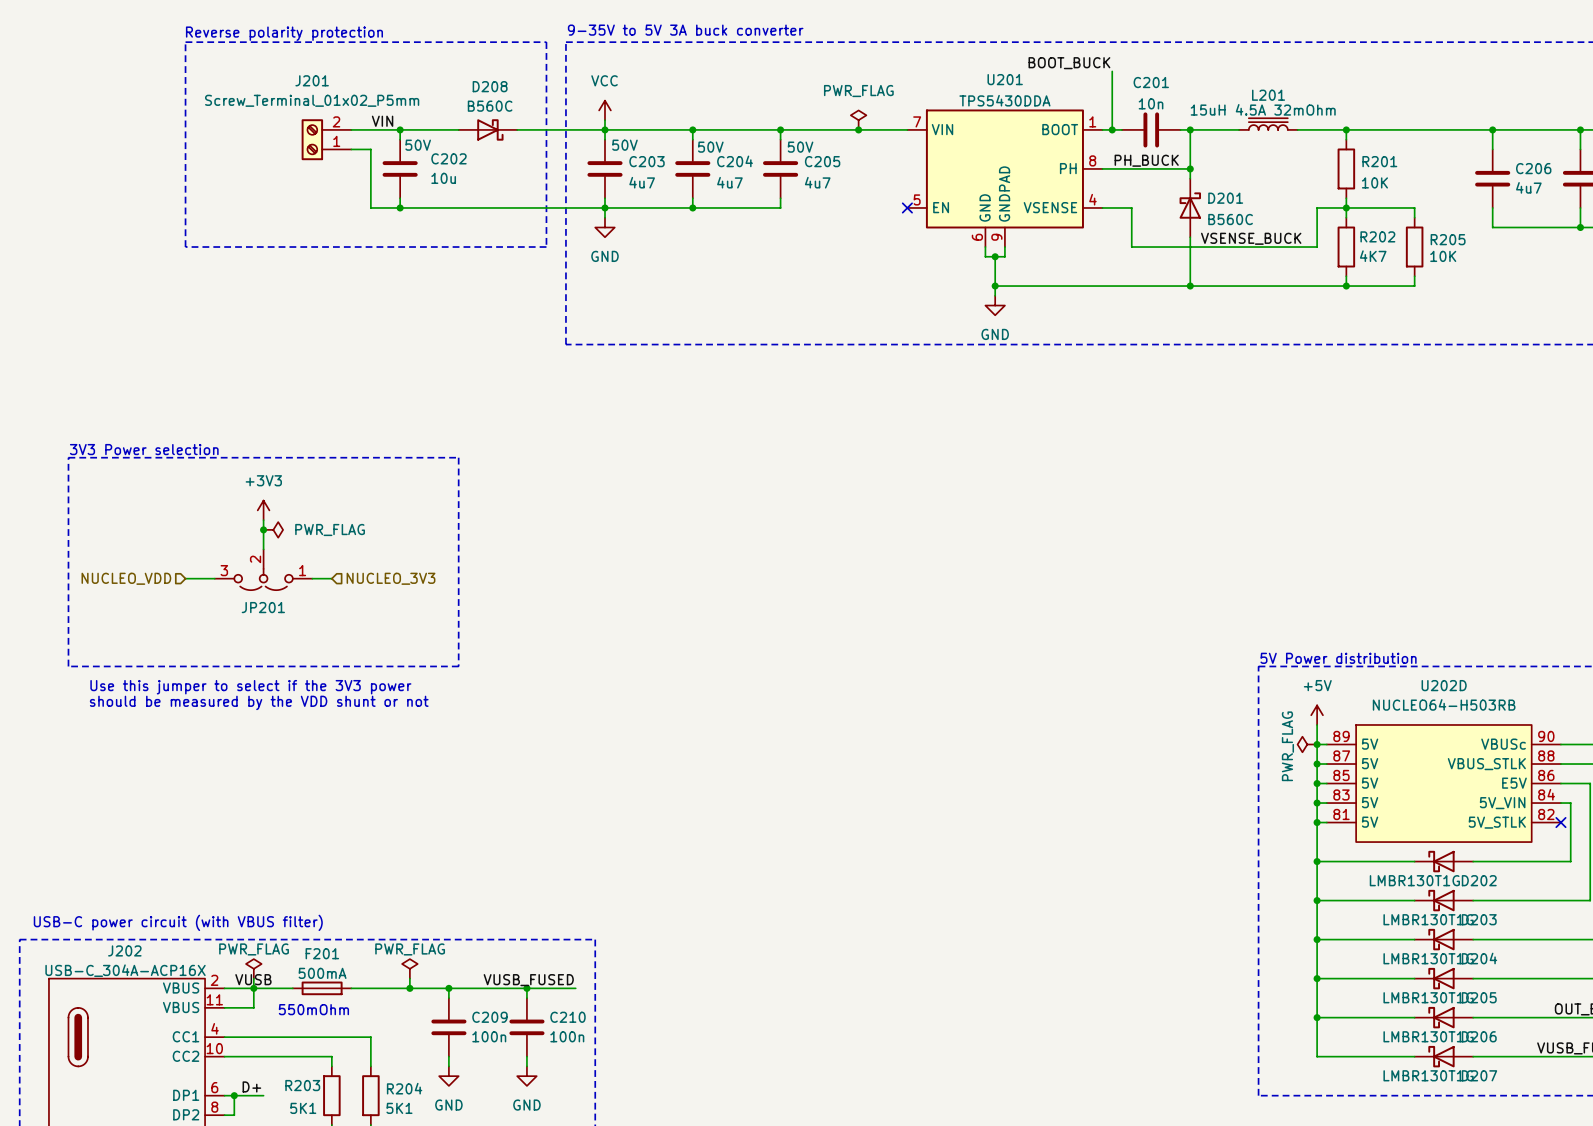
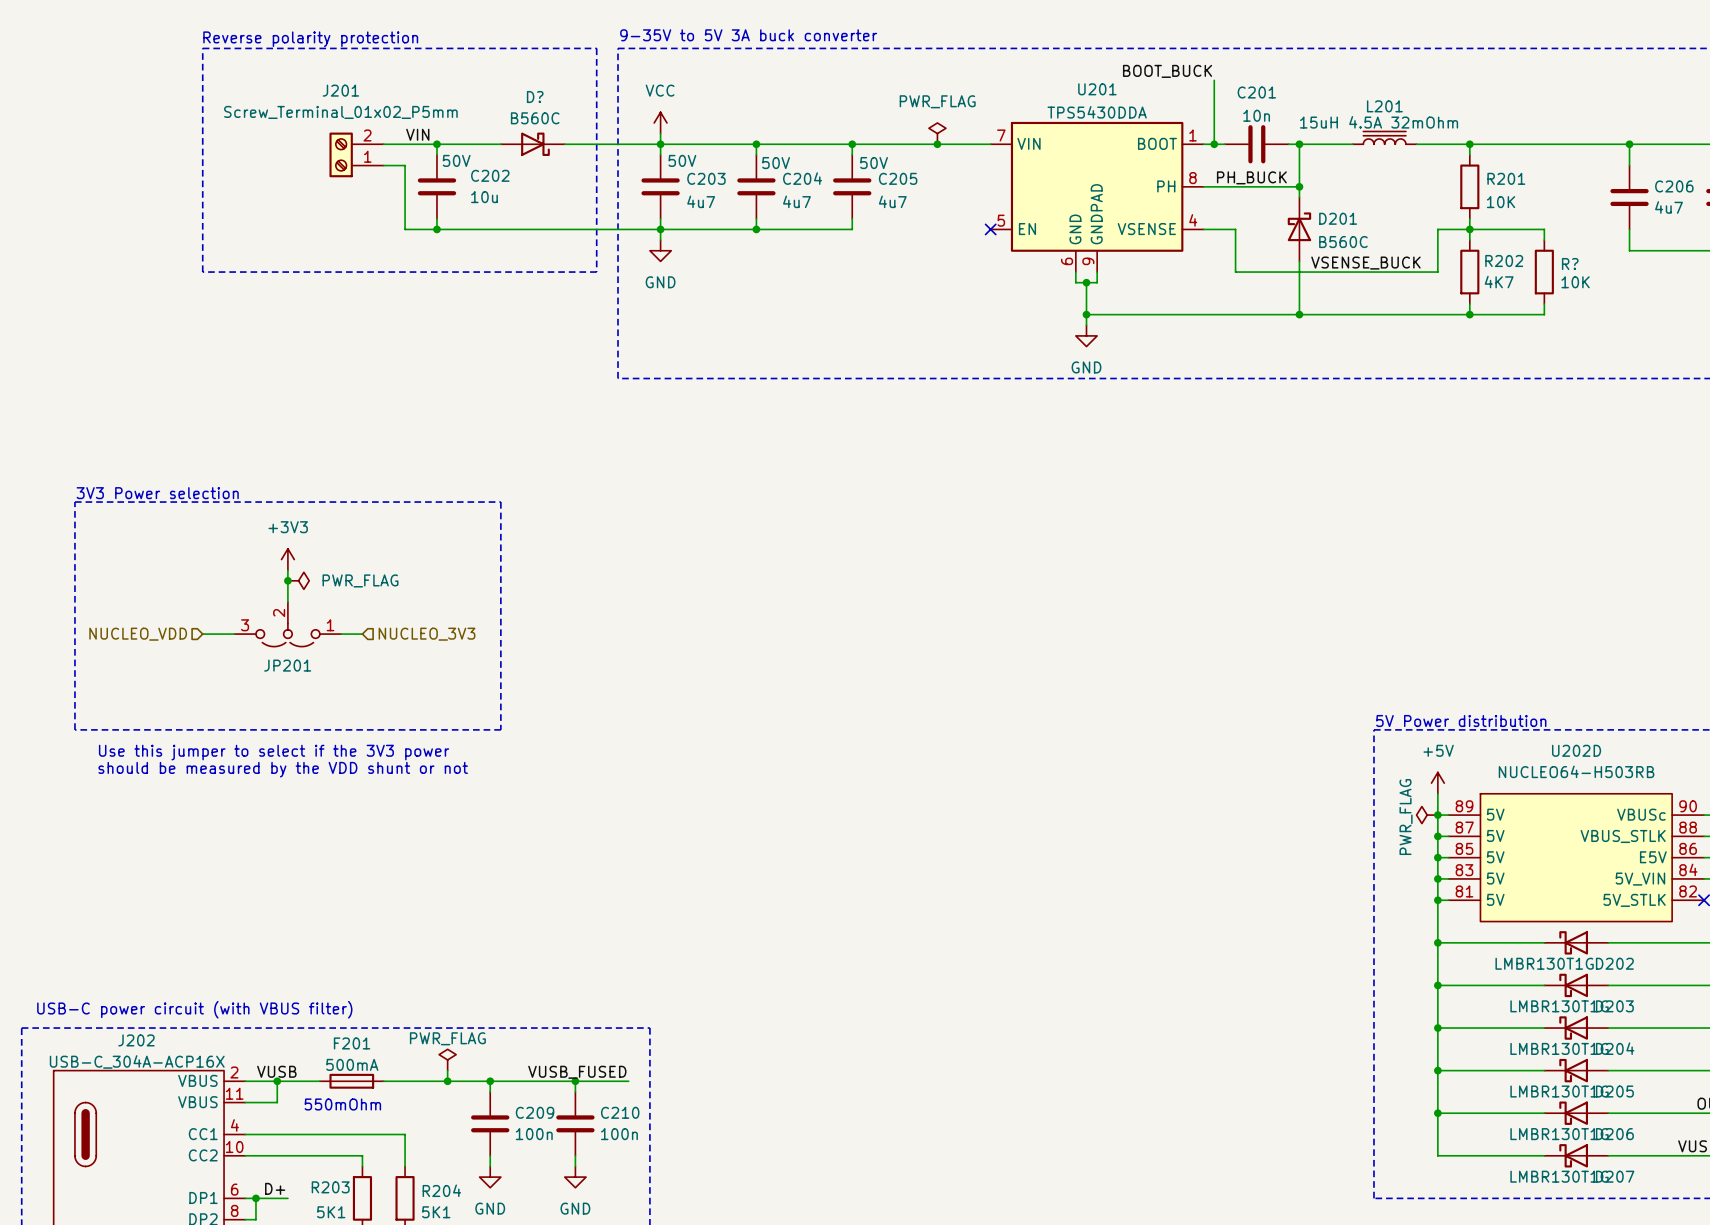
D208 name: D208 (490, 86) -> D? (535, 97)
R205 name: R205 (1448, 239) -> R? (1570, 264)
power symbol: PWR_FLAG (253, 968) -> none
wire: (253, 978) (253, 988) -> none

